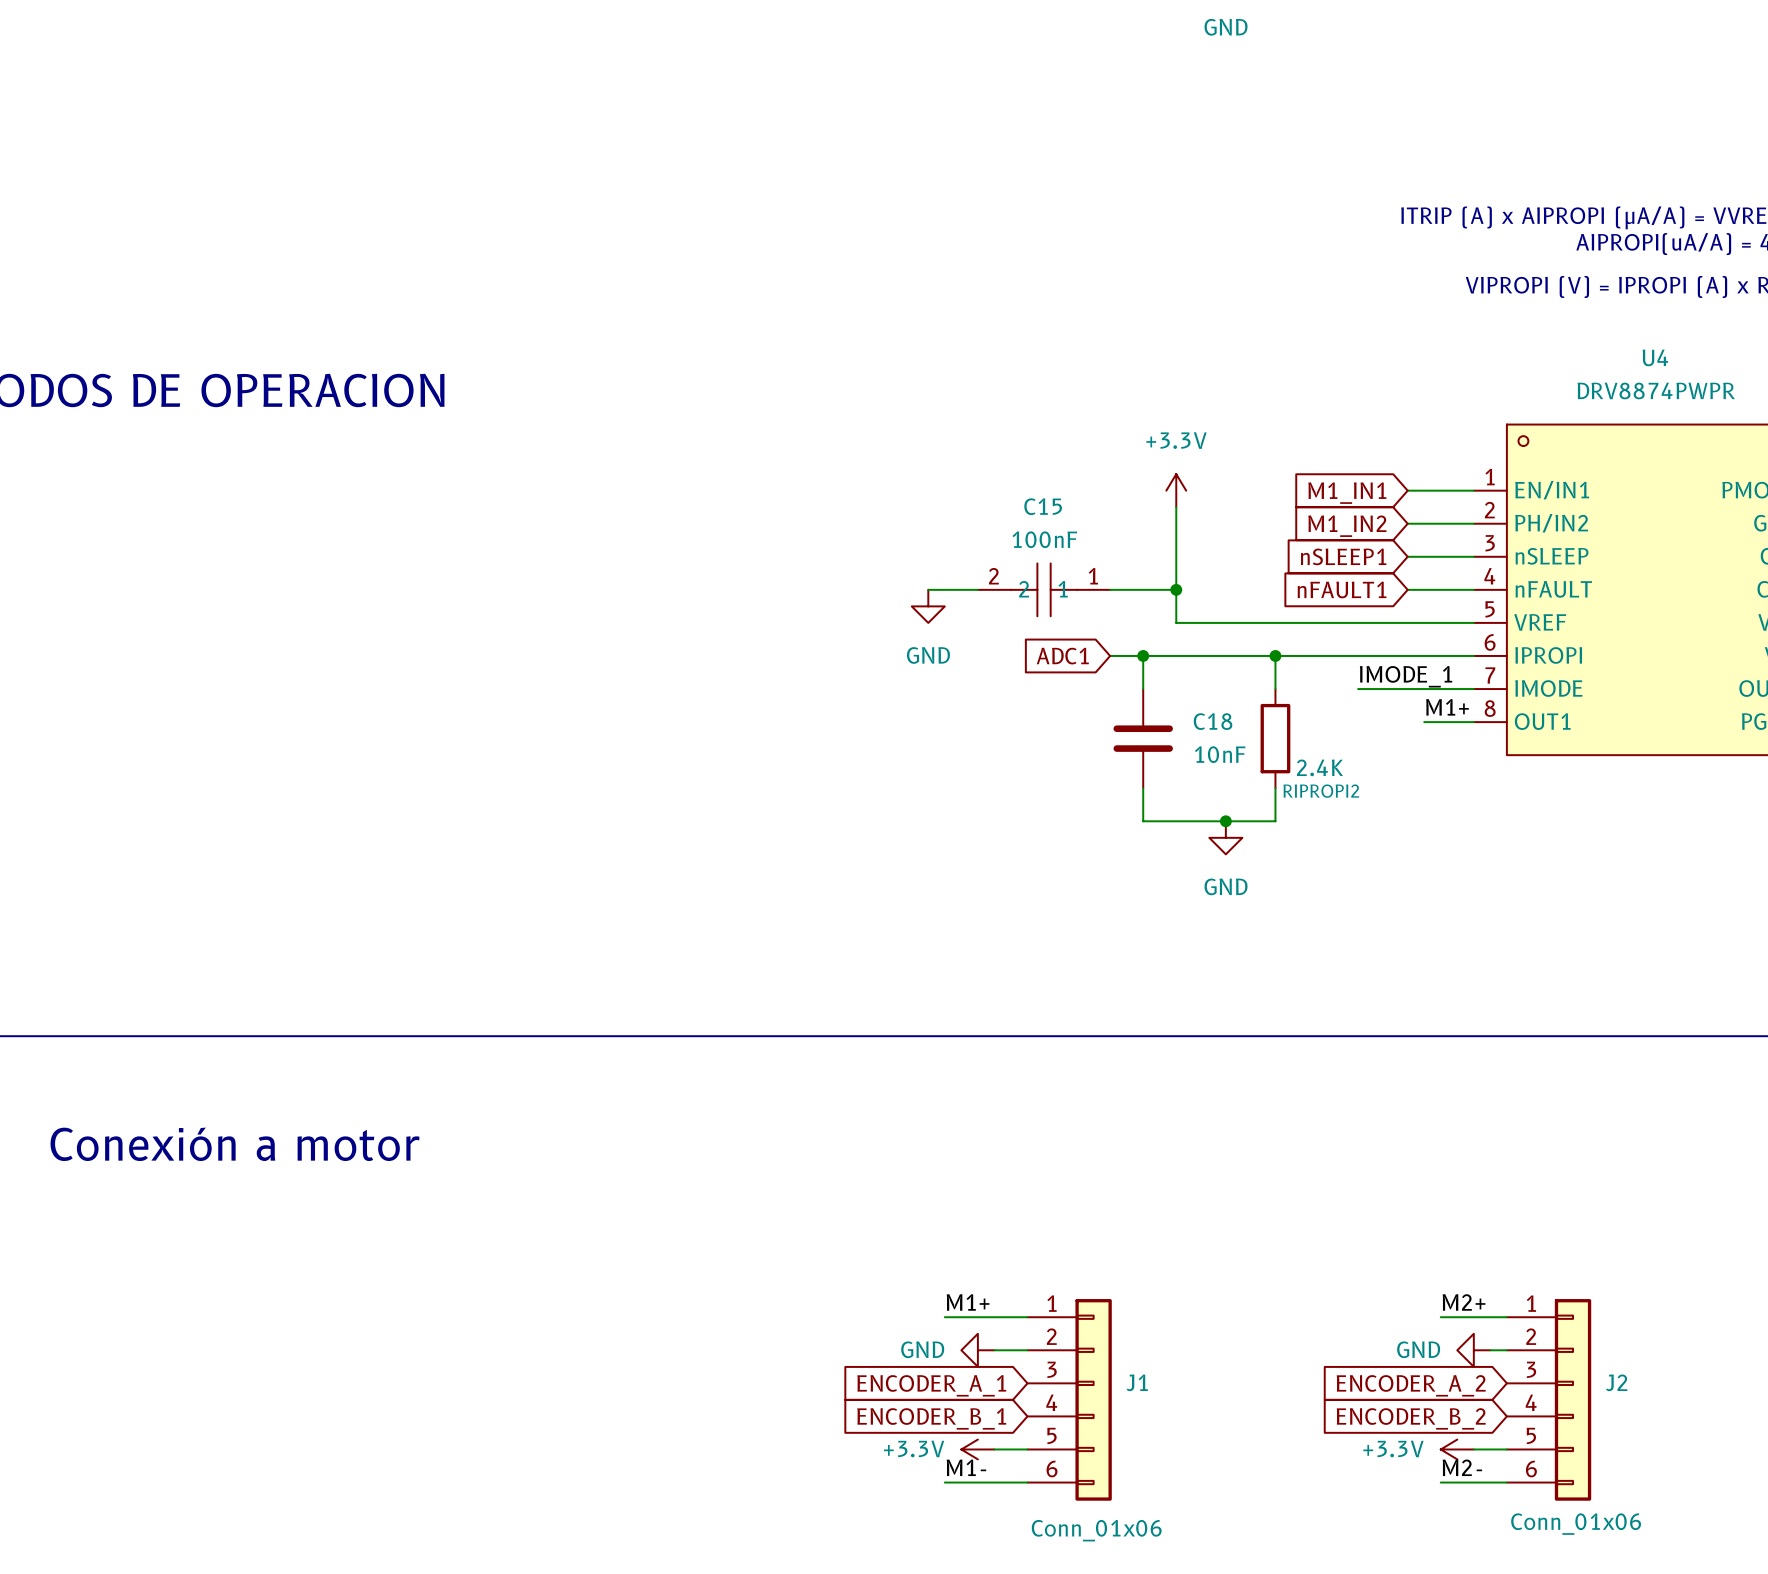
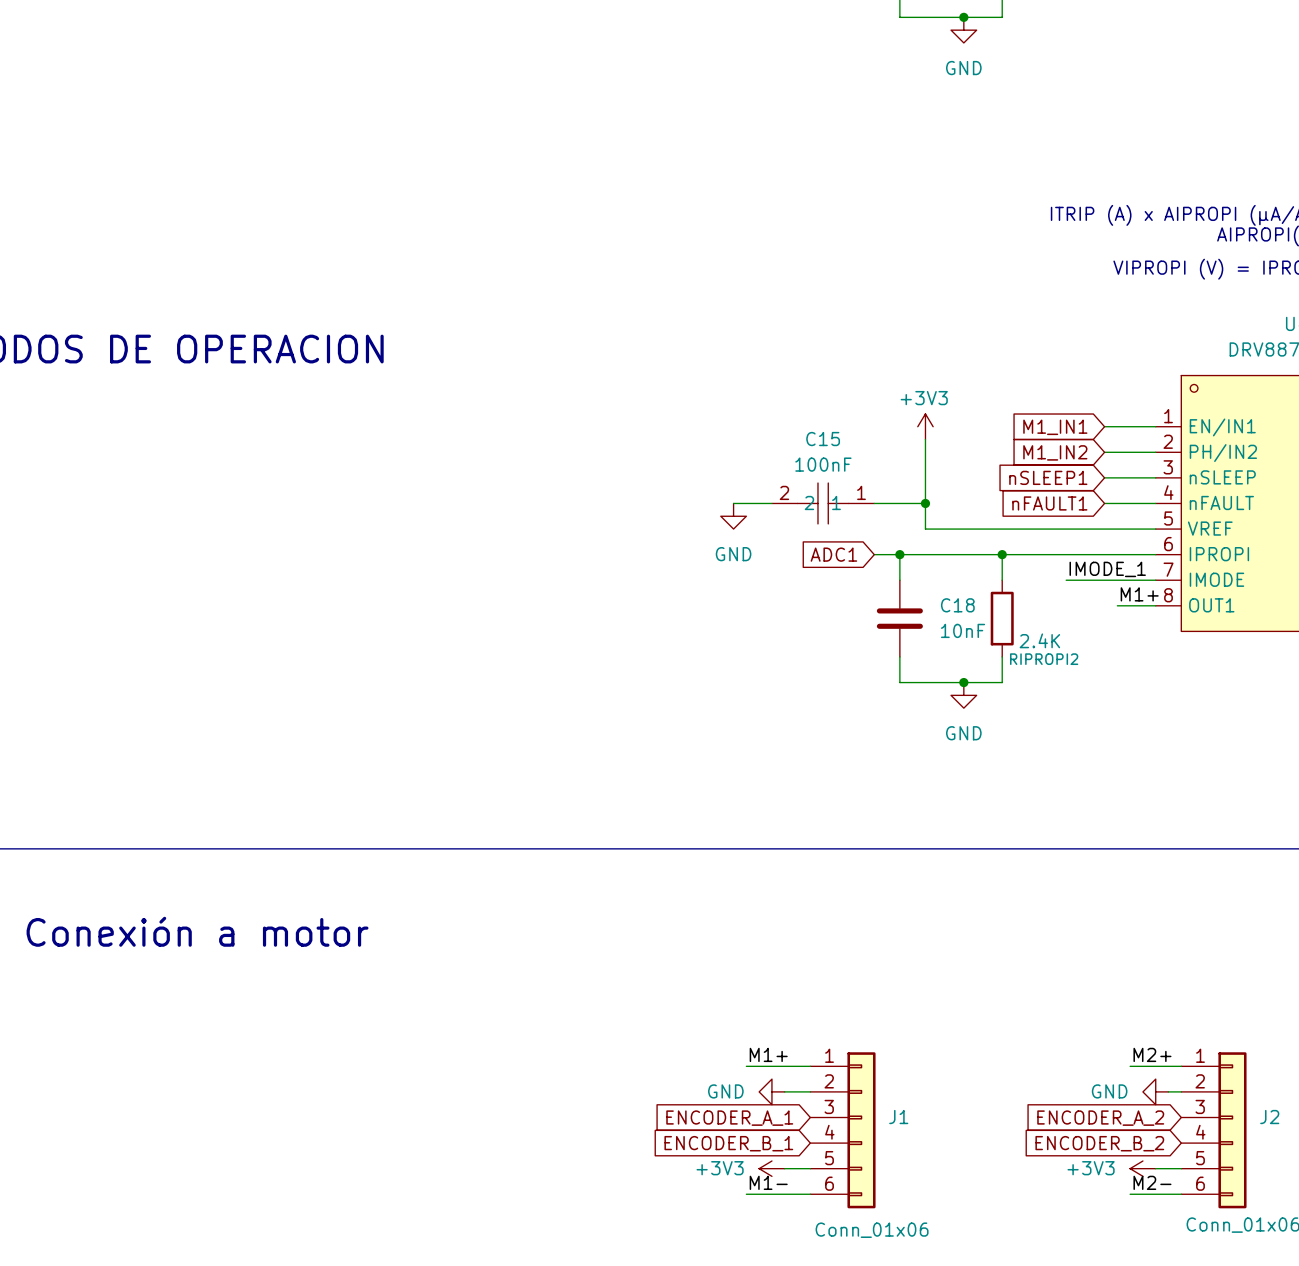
power symbol: +3.3V (1176, 490) -> +3V3 (925, 426)
power symbol: +3.3V (977, 1449) -> +3V3 (771, 1168)
power symbol: +3.3V (1457, 1449) -> +3V3 (1142, 1168)

